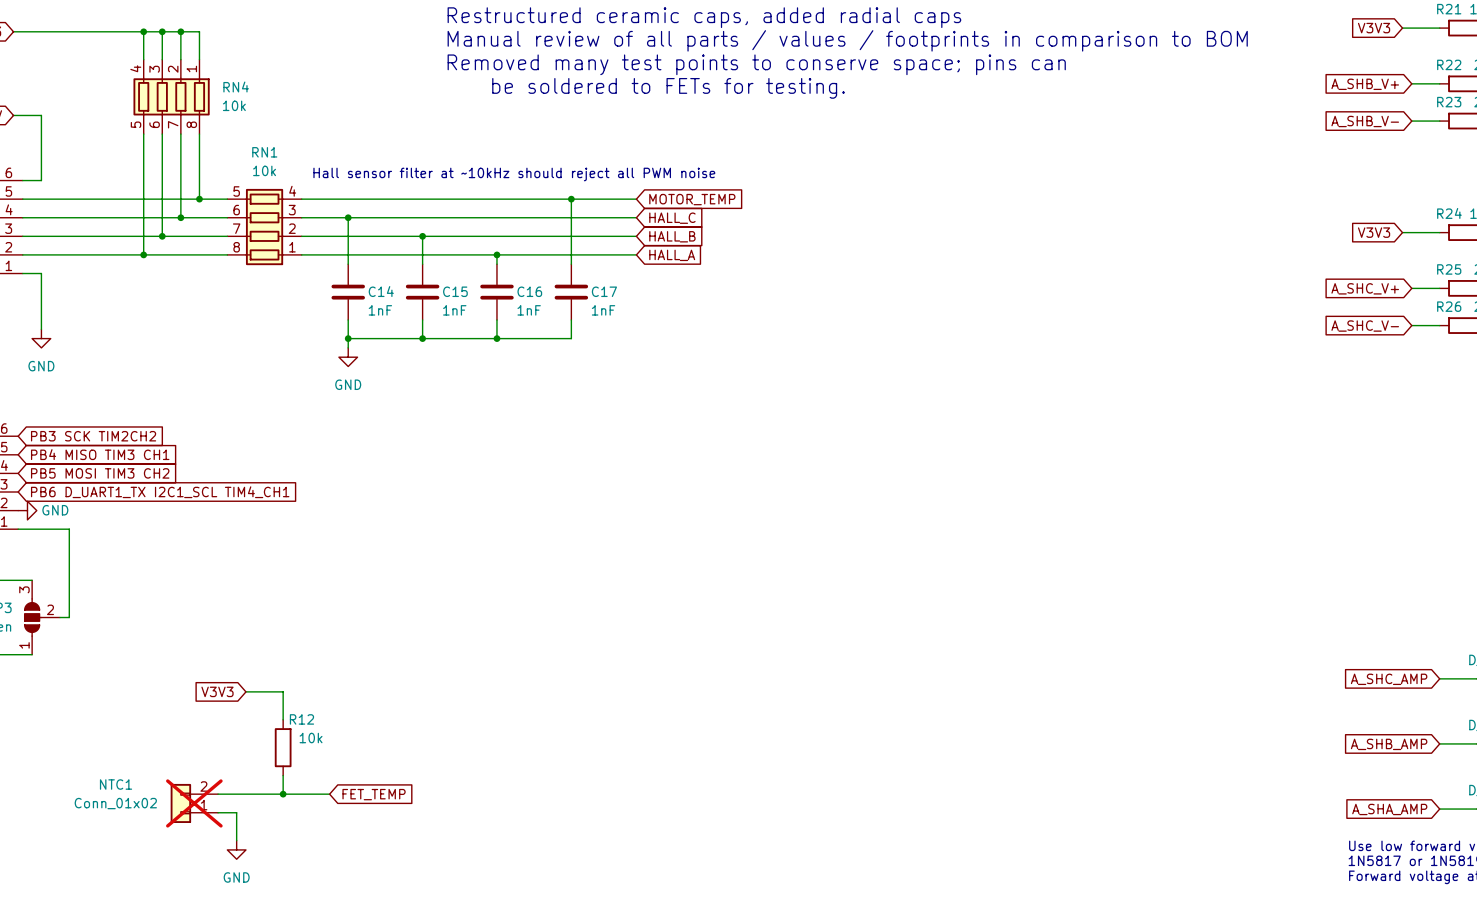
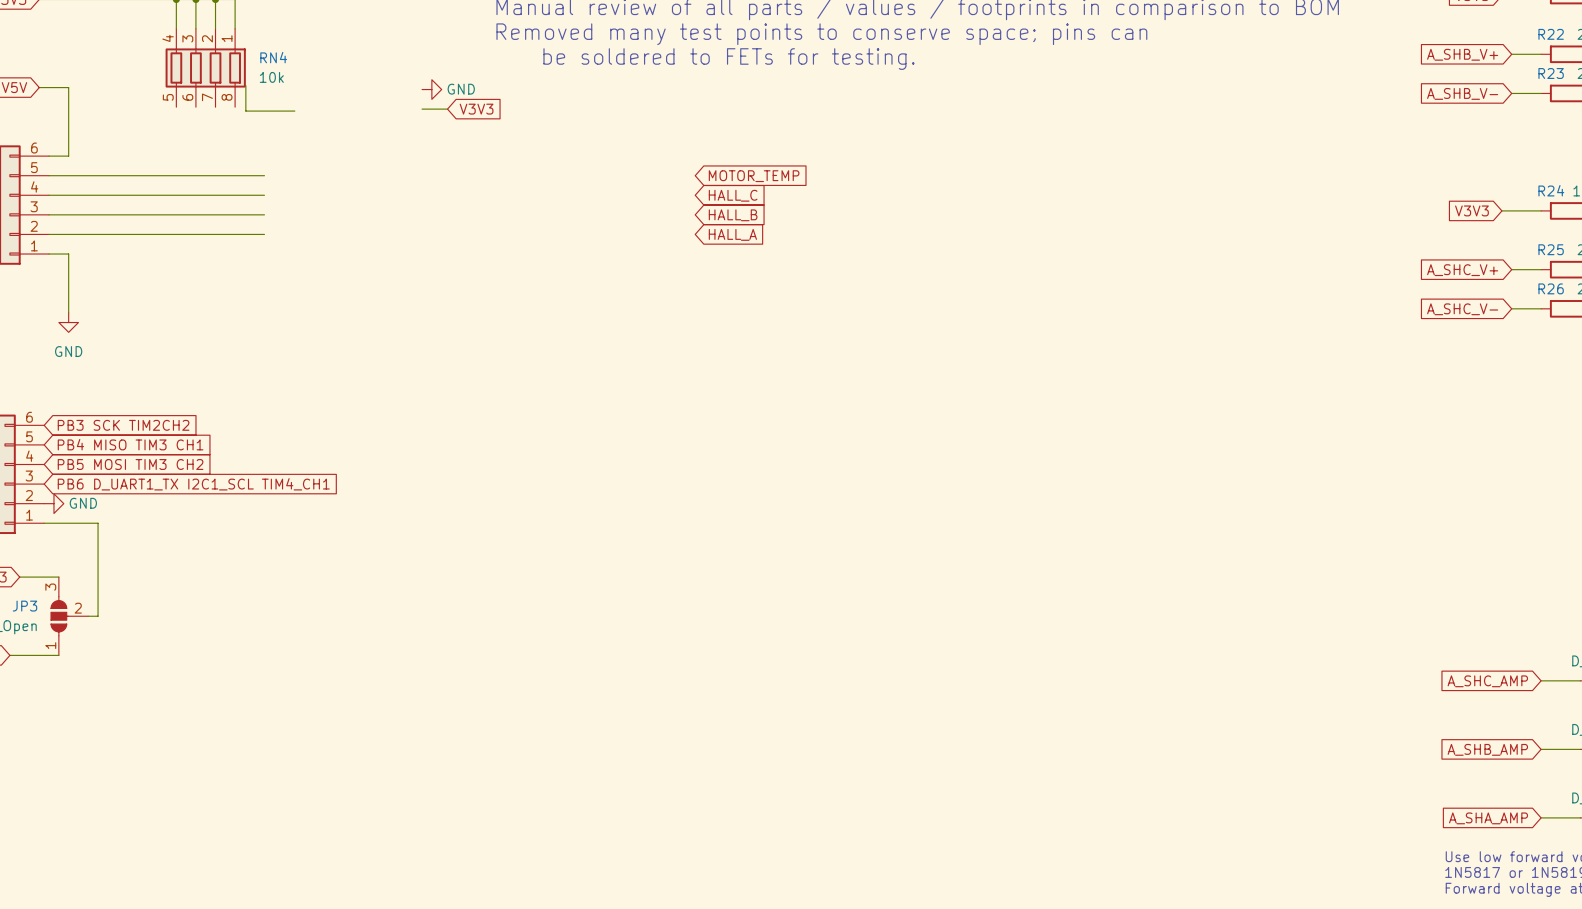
wire: none -> (245, 85) (245, 111) (294, 111)
power symbol: none -> GND (431, 89)
wire: (143, 134) (143, 254) -> none
wire: (162, 134) (162, 236) -> none
wire: (180, 134) (180, 217) -> none
wire: (199, 134) (199, 199) -> none
wire: none -> (422, 109) (447, 109)
global label: none -> V3V3 (476, 109)
text: Hall sensor filter at ~10kHz should reject all PWM noise (514, 174) -> none
junction: (199, 199) -> none
wire: (301, 199) (636, 199) -> none
wire: (571, 199) (571, 264) -> none
junction: (571, 199) -> none
junction: (180, 217) -> none
wire: (301, 217) (636, 217) -> none
wire: (348, 217) (348, 264) -> none
junction: (348, 217) -> none
RN1: 10k (264, 227) -> none
junction: (162, 236) -> none
wire: (301, 236) (636, 236) -> none
wire: (422, 236) (422, 264) -> none
junction: (422, 236) -> none
junction: (143, 254) -> none
wire: (301, 254) (636, 254) -> none
wire: (496, 254) (496, 264) -> none
junction: (496, 254) -> none
C14: 1nF (348, 292) -> none
C15: 1nF (422, 292) -> none
C16: 1nF (496, 292) -> none
C17: 1nF (571, 292) -> none
wire: (348, 320) (348, 347) -> none
wire: (422, 320) (422, 338) -> none
wire: (496, 320) (496, 338) -> none
wire: (571, 320) (571, 338) (348, 338) -> none
junction: (348, 338) -> none
junction: (422, 338) -> none
junction: (496, 338) -> none
power symbol: GND (348, 357) -> none
global label: V3V3 (217, 691) -> none
wire: (245, 691) (283, 691) (283, 719) -> none
R12: 10k (283, 747) -> none
wire: (283, 775) (283, 794) -> none
wire: (218, 794) (329, 794) -> none
junction: (283, 794) -> none
global label: FET_TEMP (374, 794) -> none
NTC1: Conn_01x02 (194, 803) -> none
wire: (218, 812) (236, 812) (236, 840) -> none
power symbol: GND (236, 849) -> none

